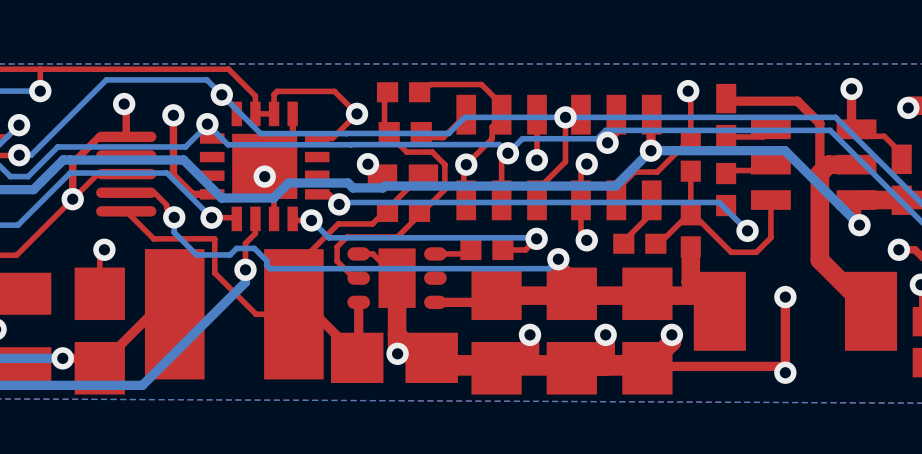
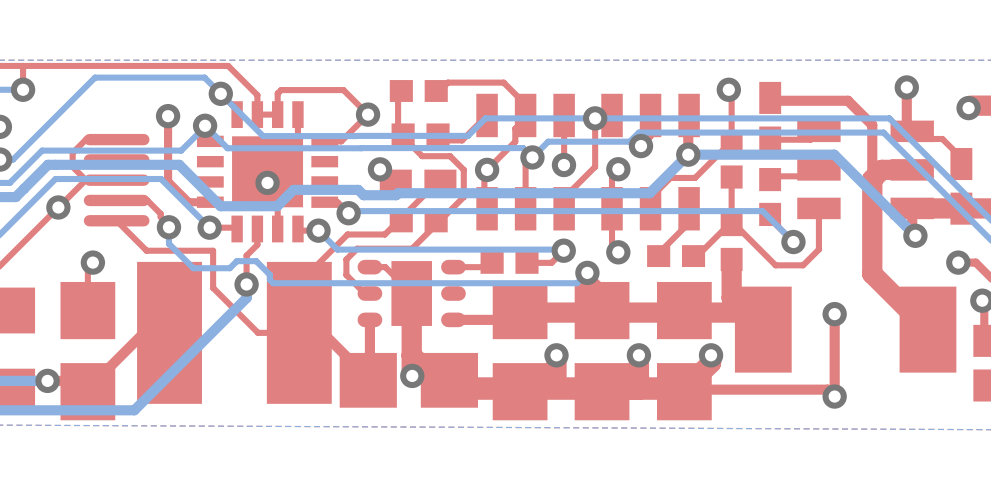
top track: (124, 104) (126, 106) (126, 136) -> none
via: (124, 104) -> none
top track: (99, 136) (72, 163) (72, 199) -> (87, 139) (72, 152) (72, 166) (85, 180)

